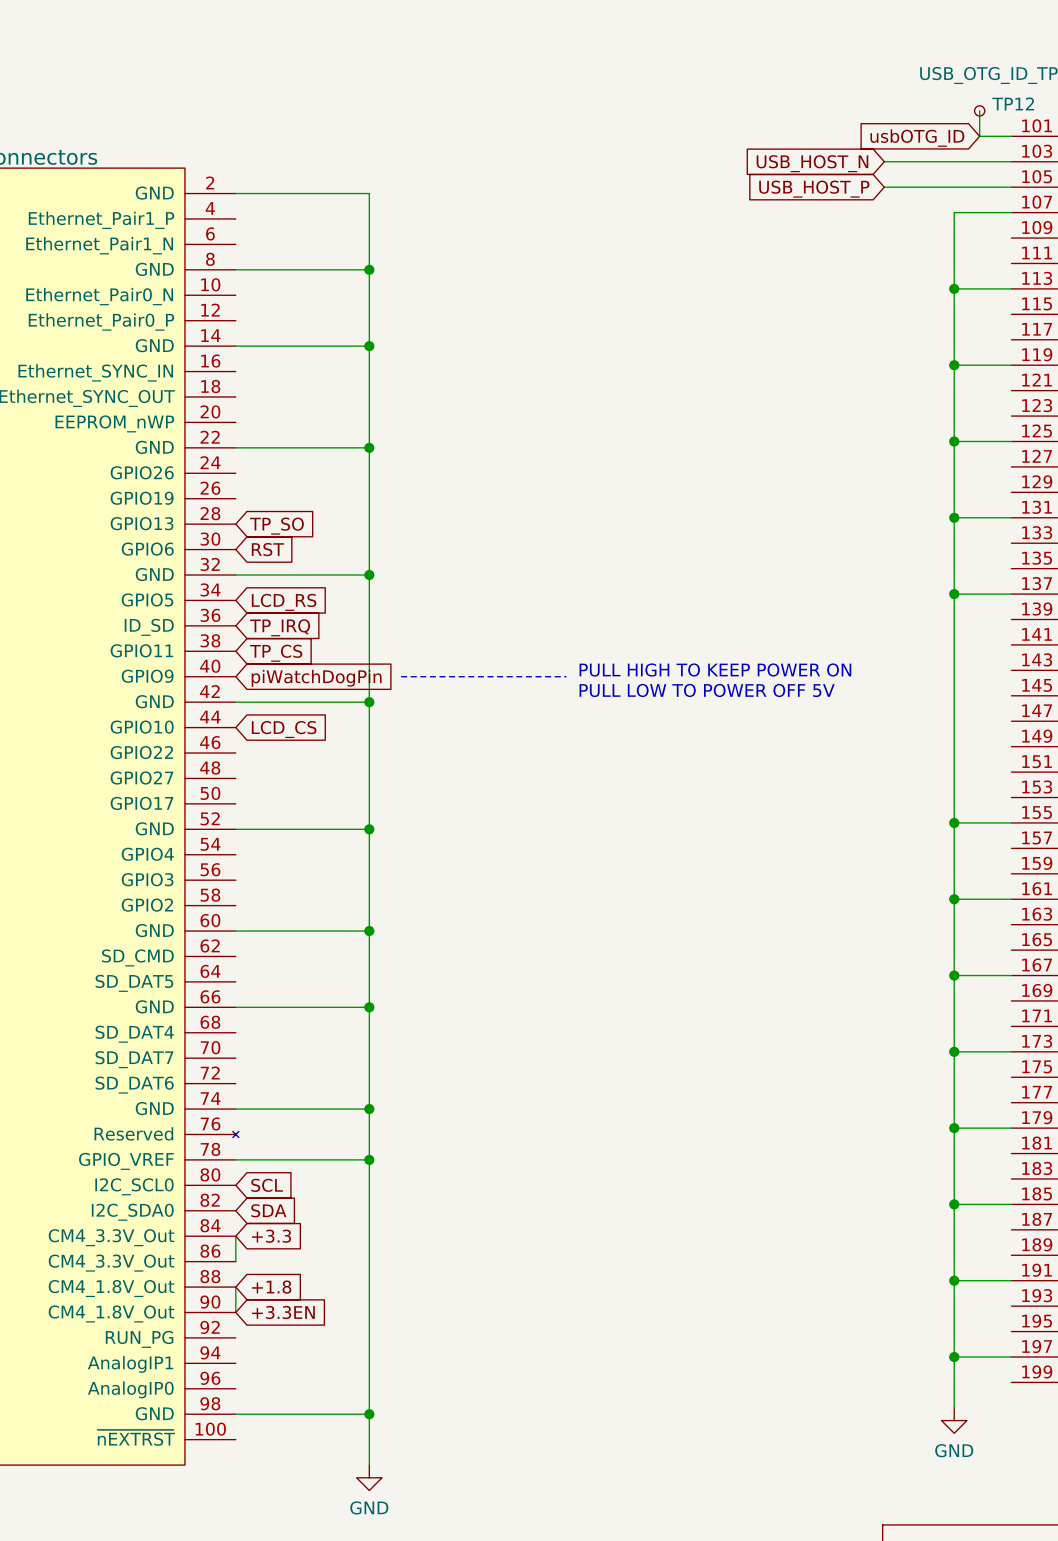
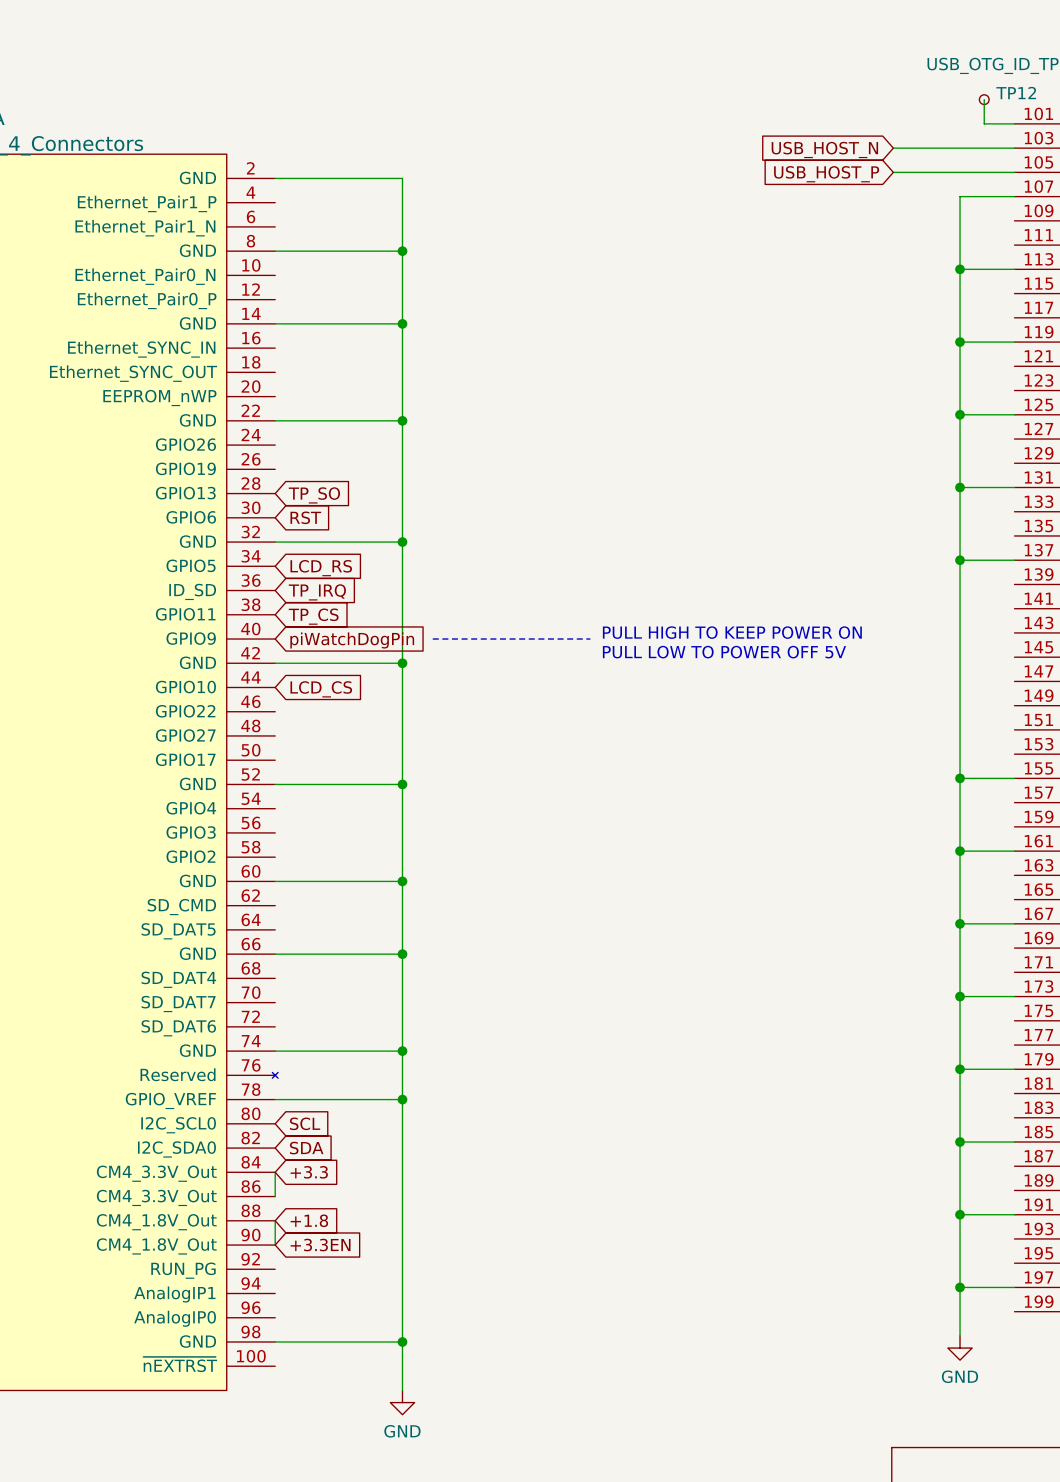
global label: usbOTG_ID (917, 138) -> none

